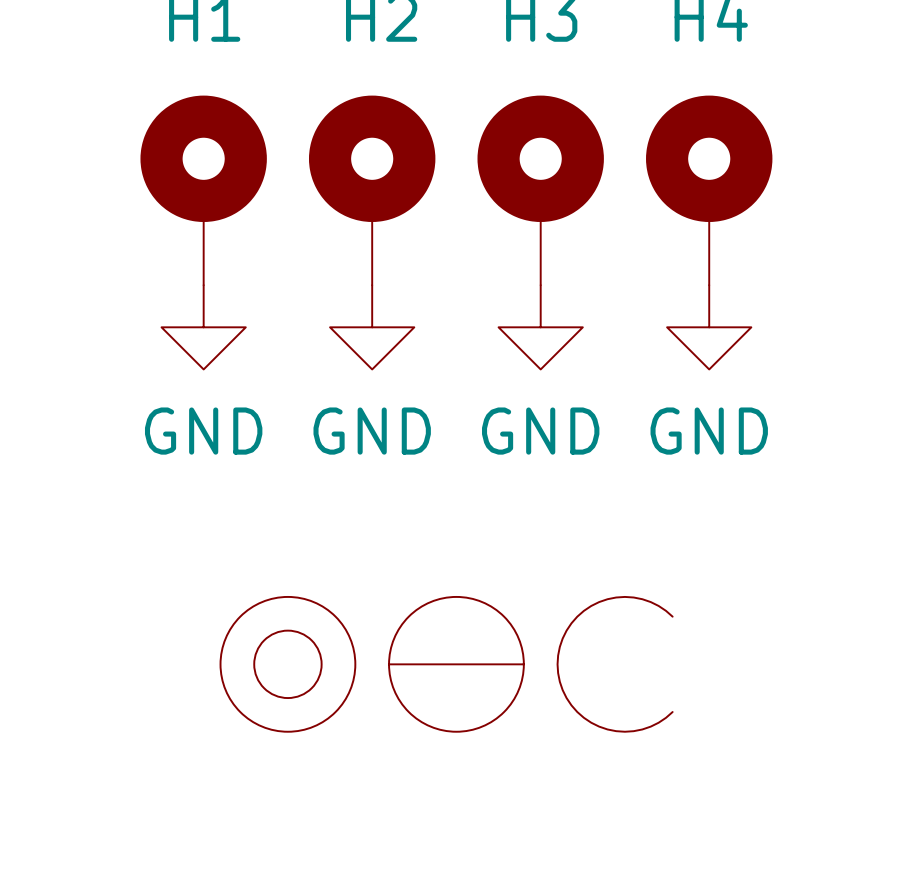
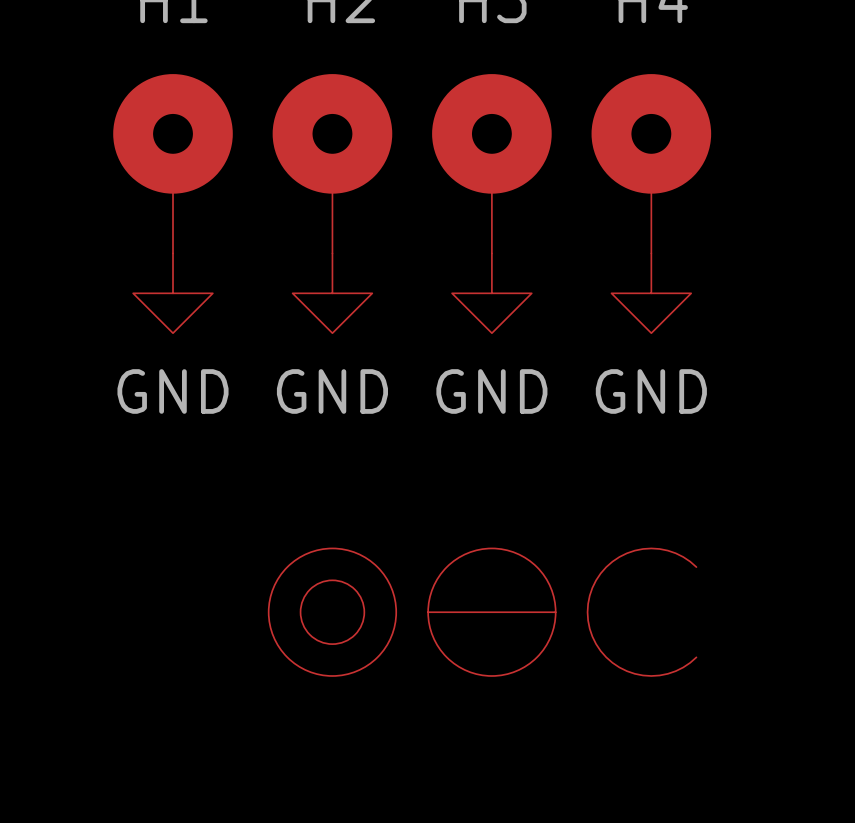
part position: (446, 664) -> (482, 612)

